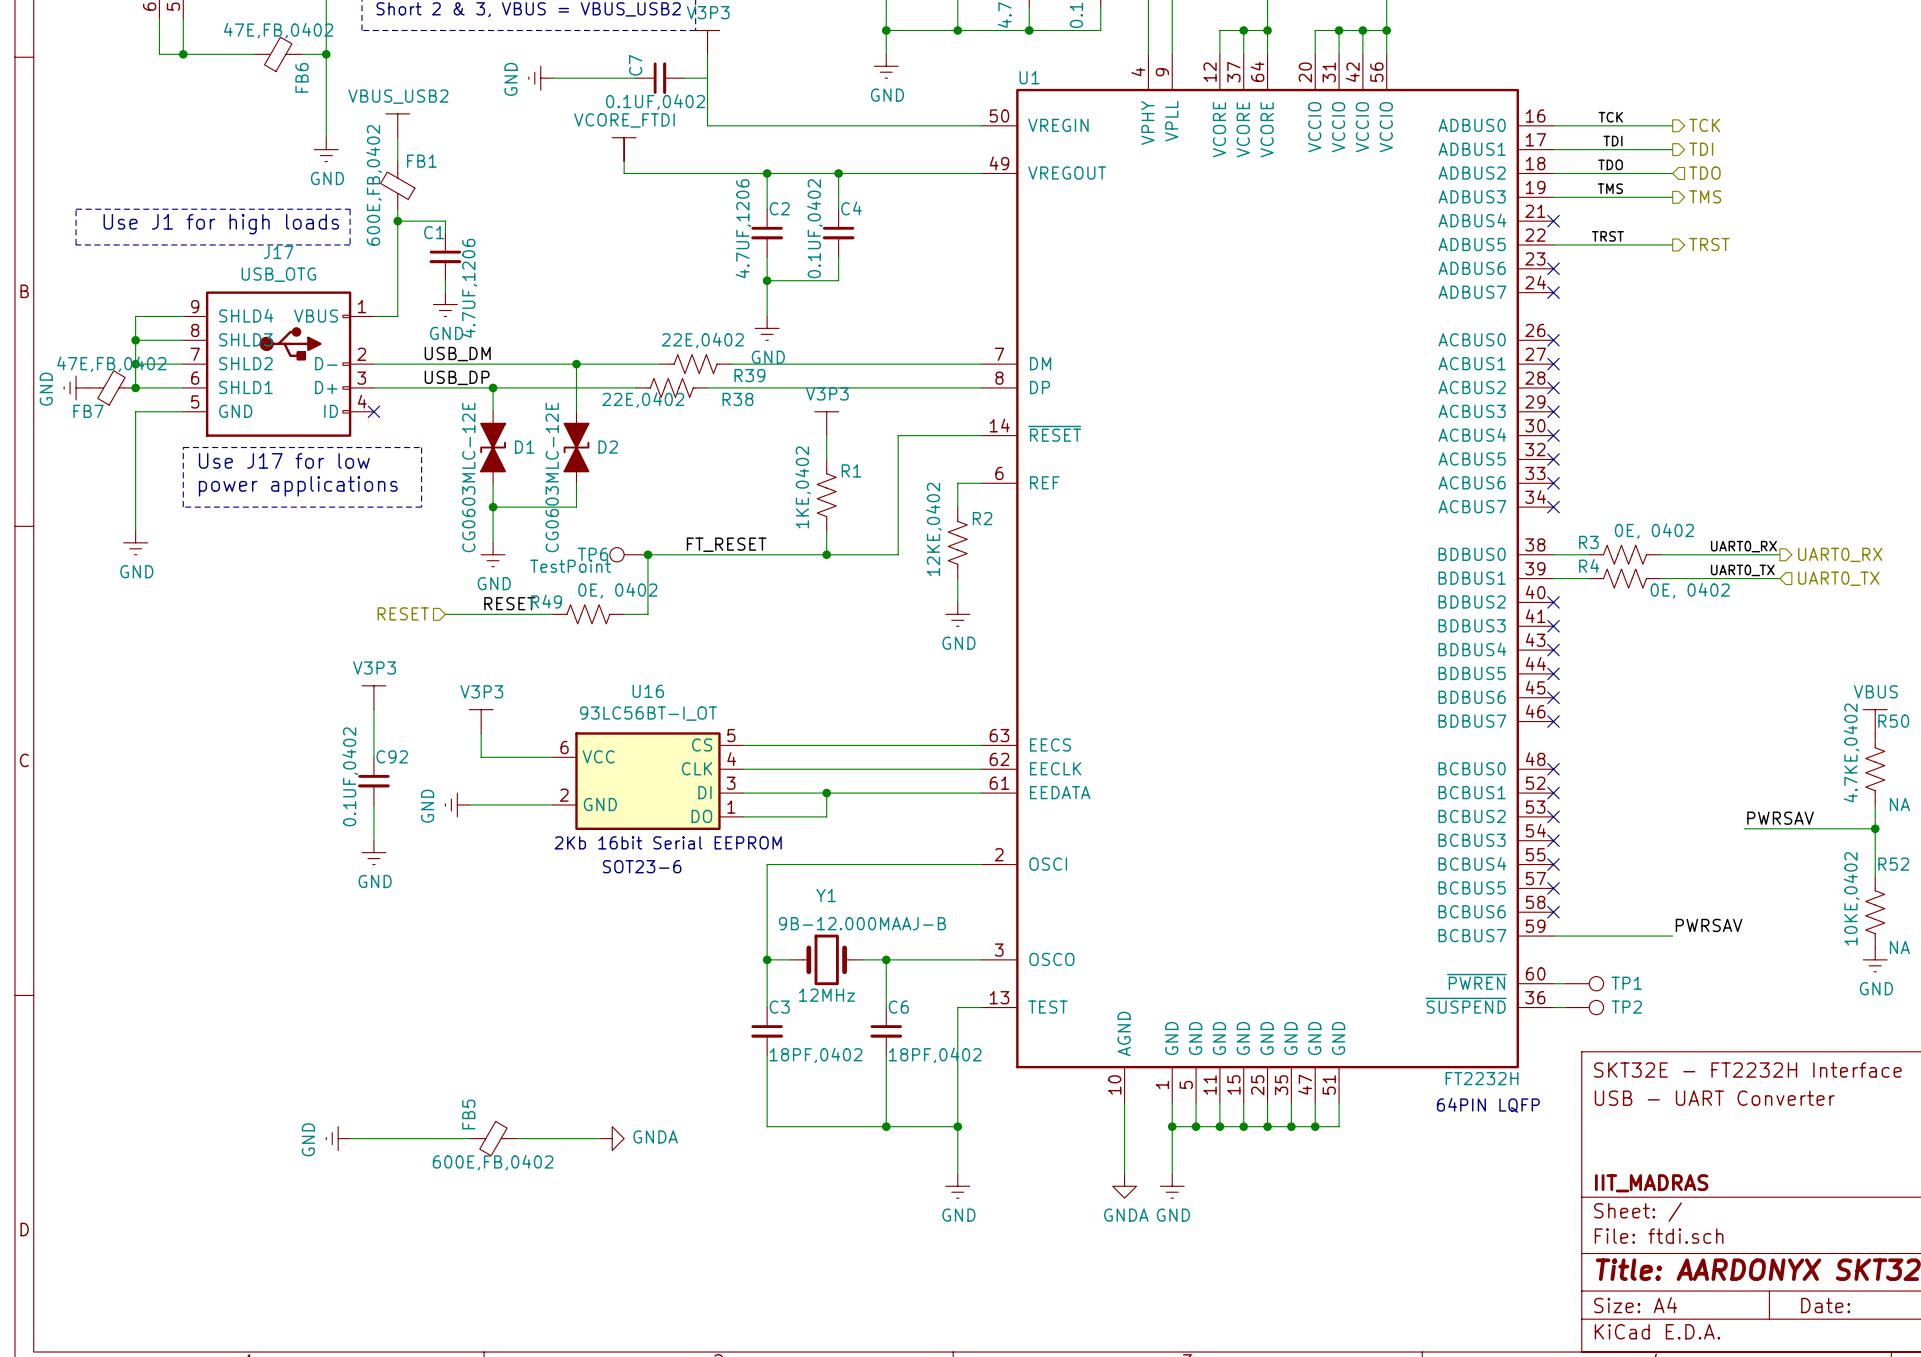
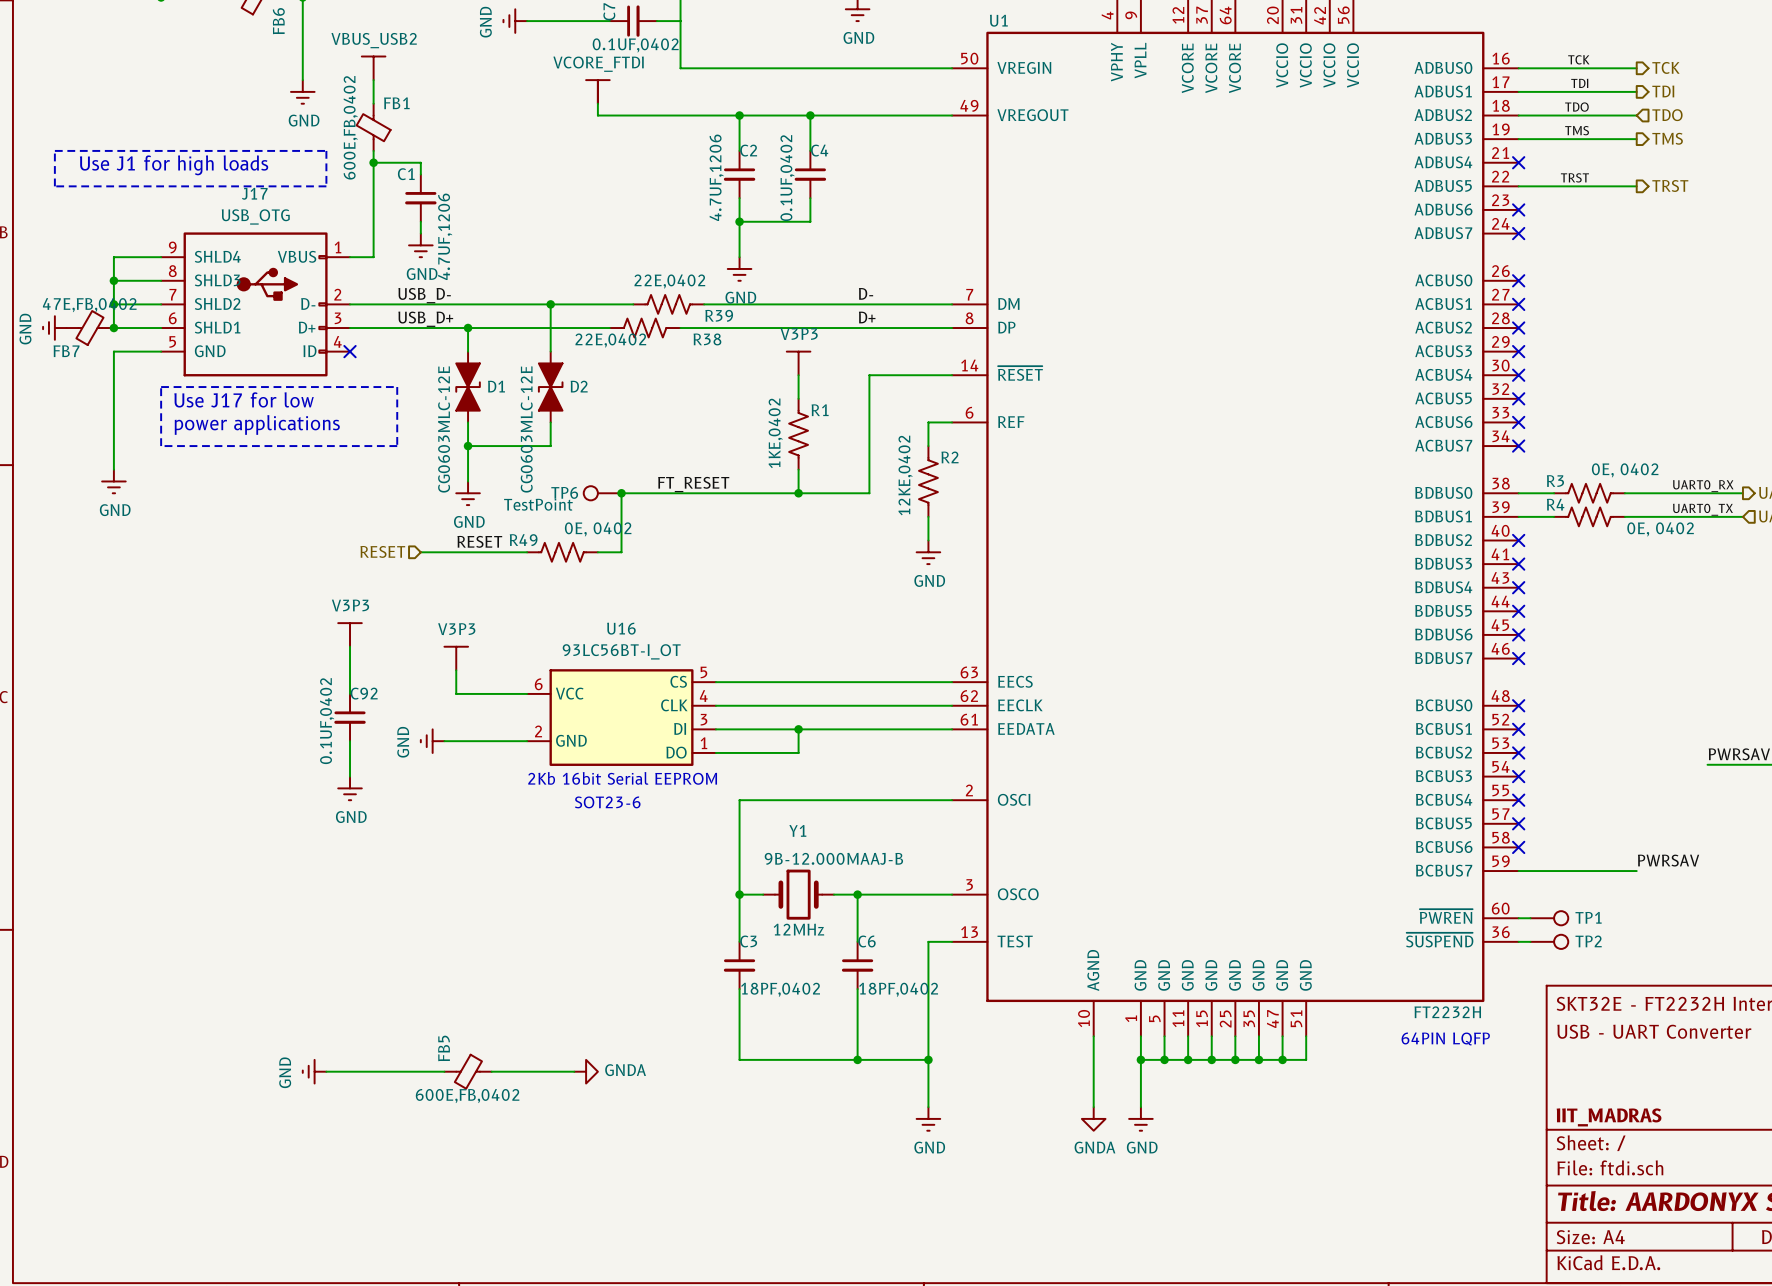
label: none -> D- (866, 293)
label: USB_DM (457, 354) -> USB_D- (424, 295)
label: USB_DP (457, 377) -> USB_D+ (425, 319)
label: none -> D+ (867, 317)

